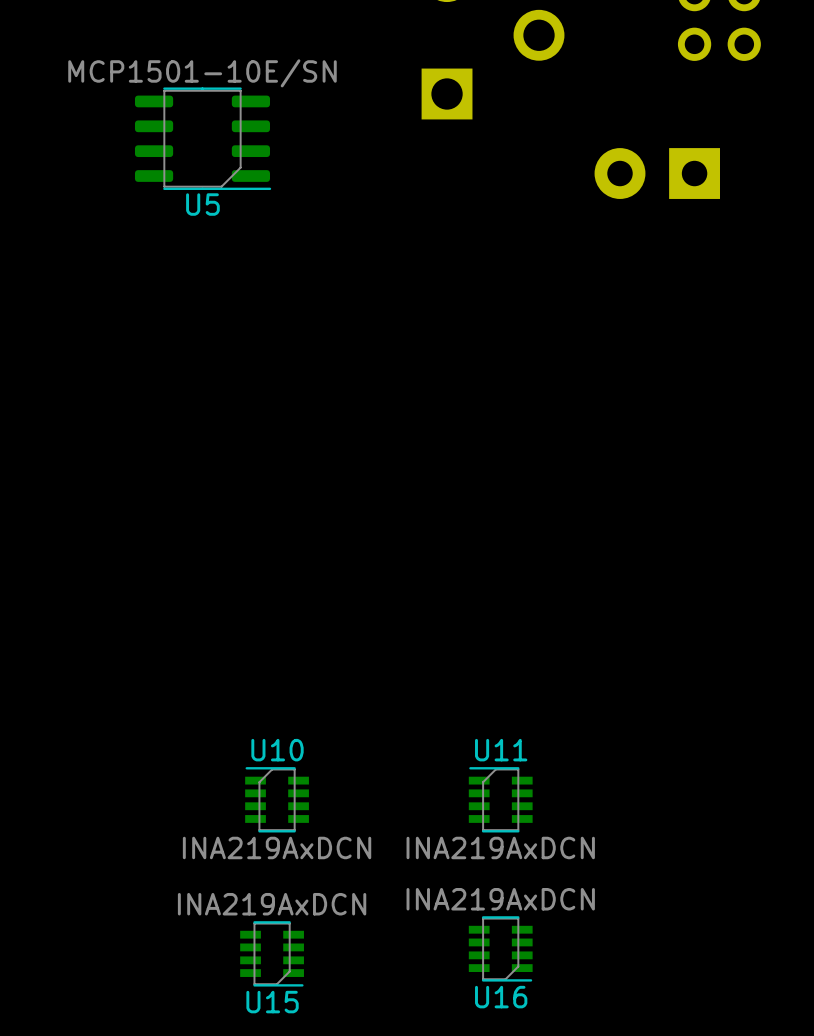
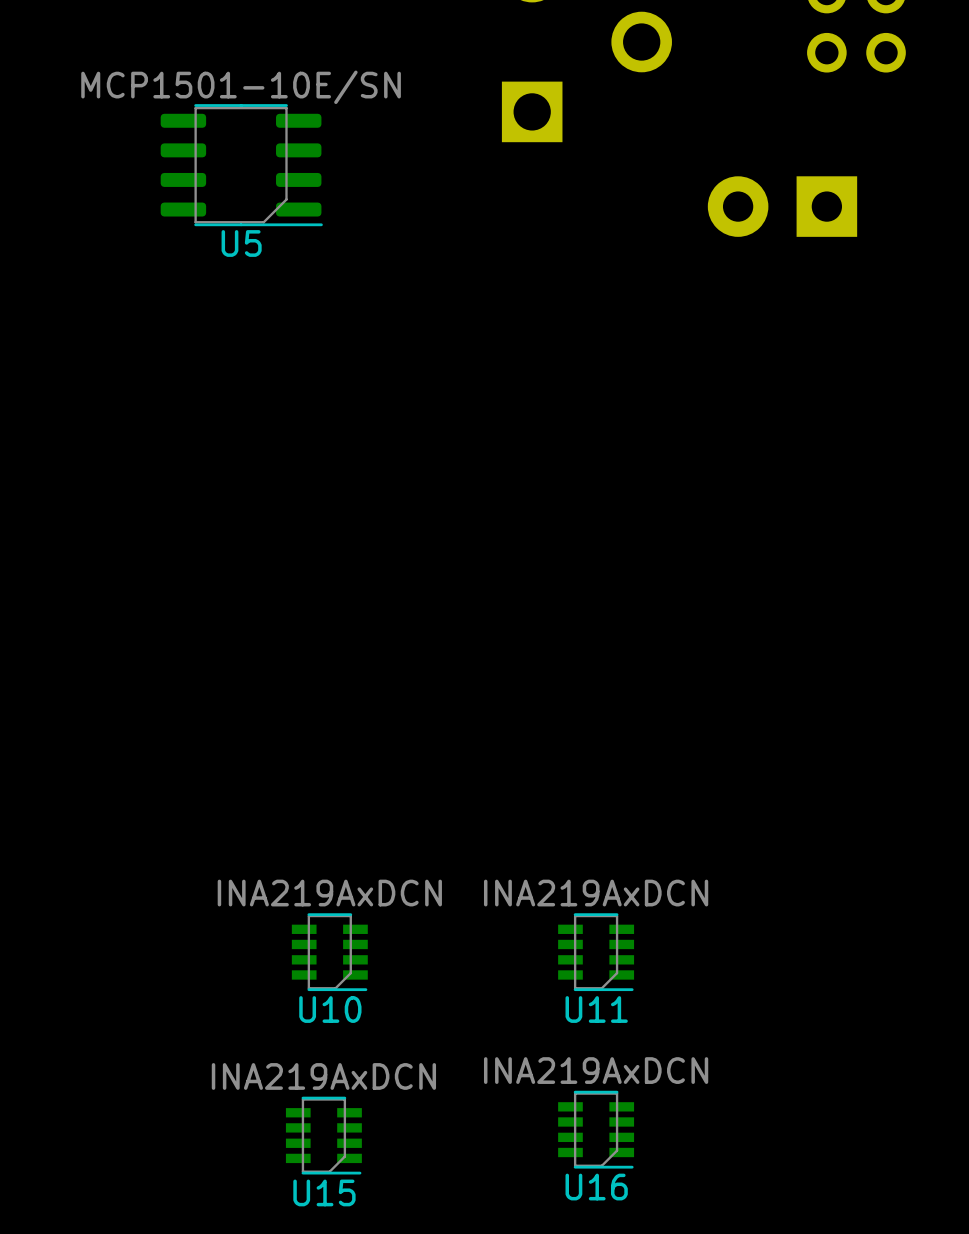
U10 rotation: 0° (277, 799) -> 180° (329, 952)
U11 rotation: 0° (500, 799) -> 180° (596, 952)

